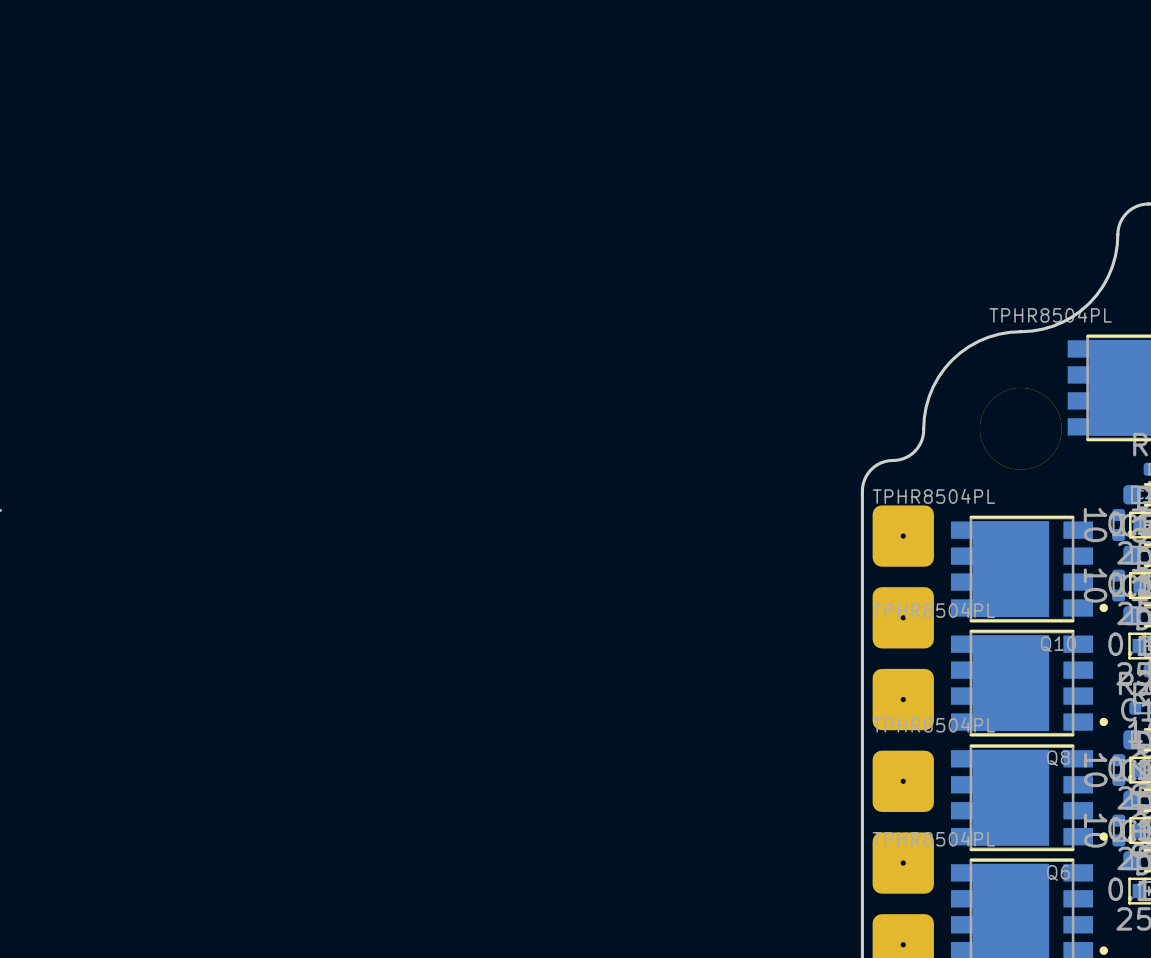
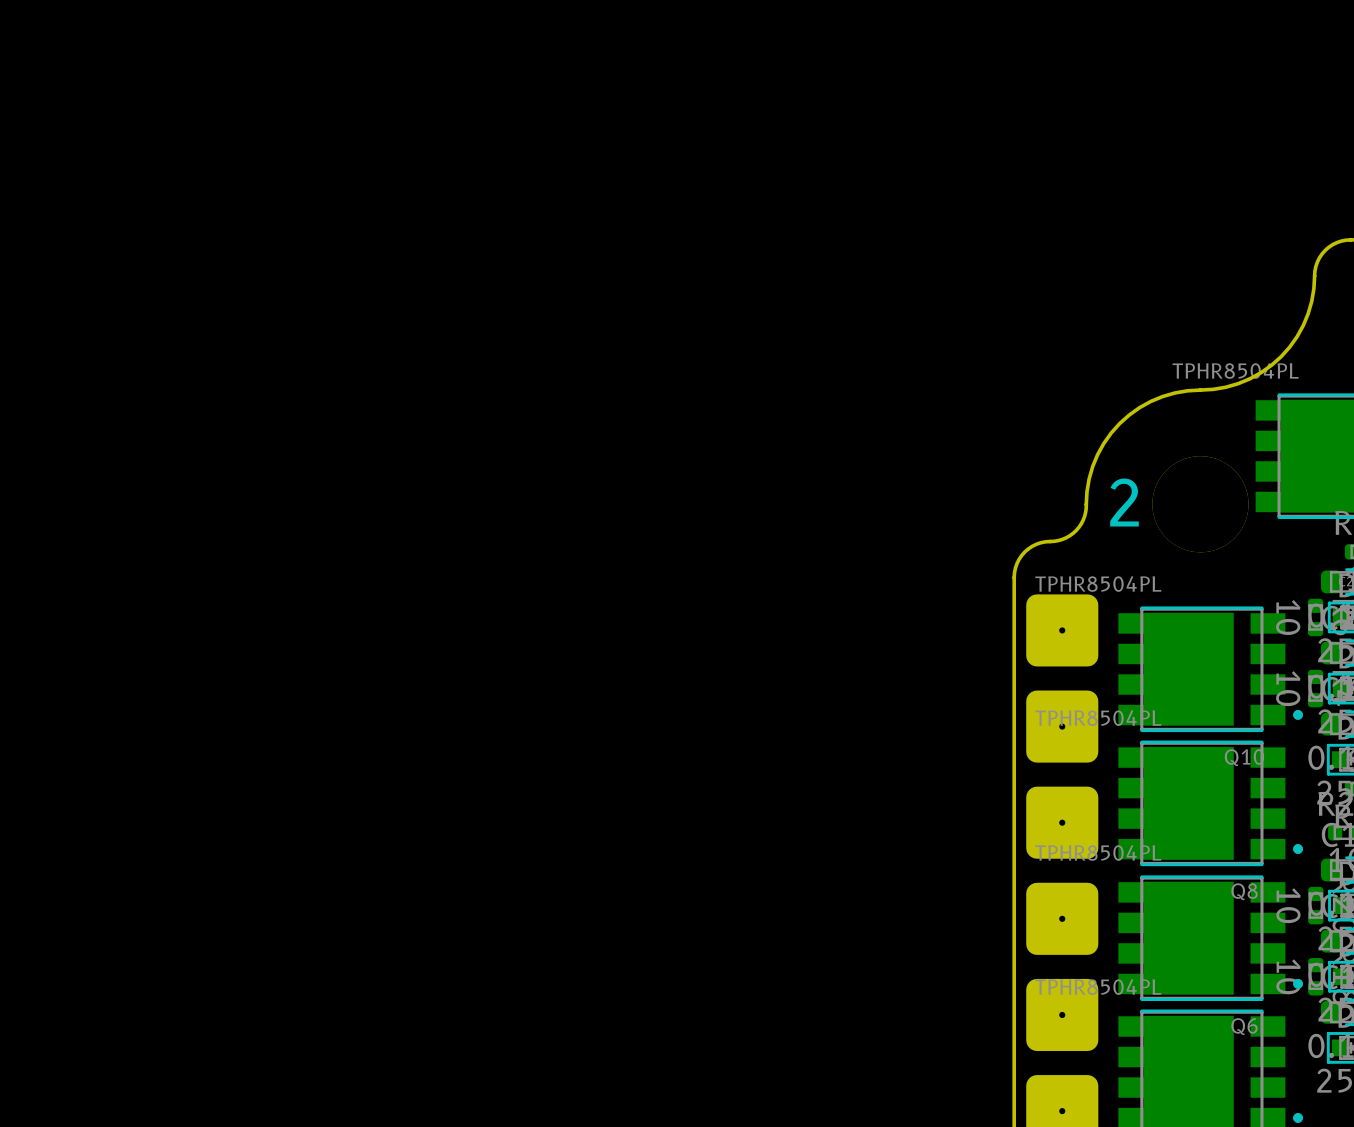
text: none -> 2 (1124, 502)

